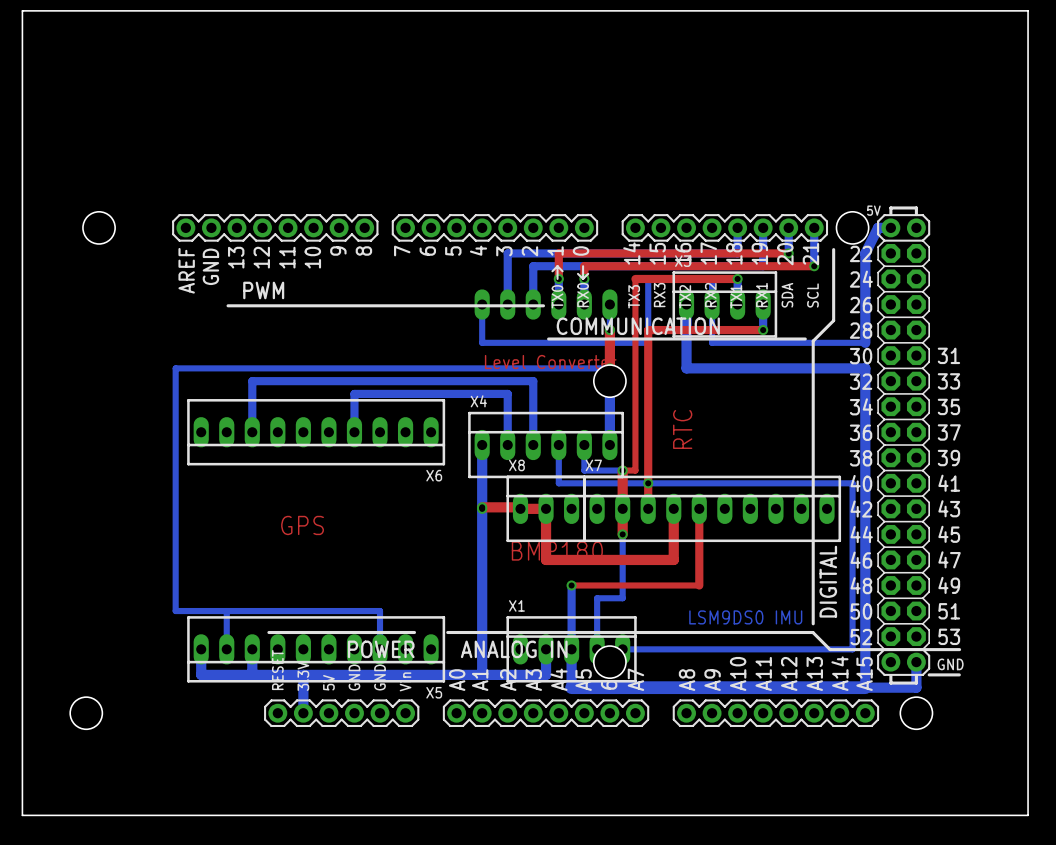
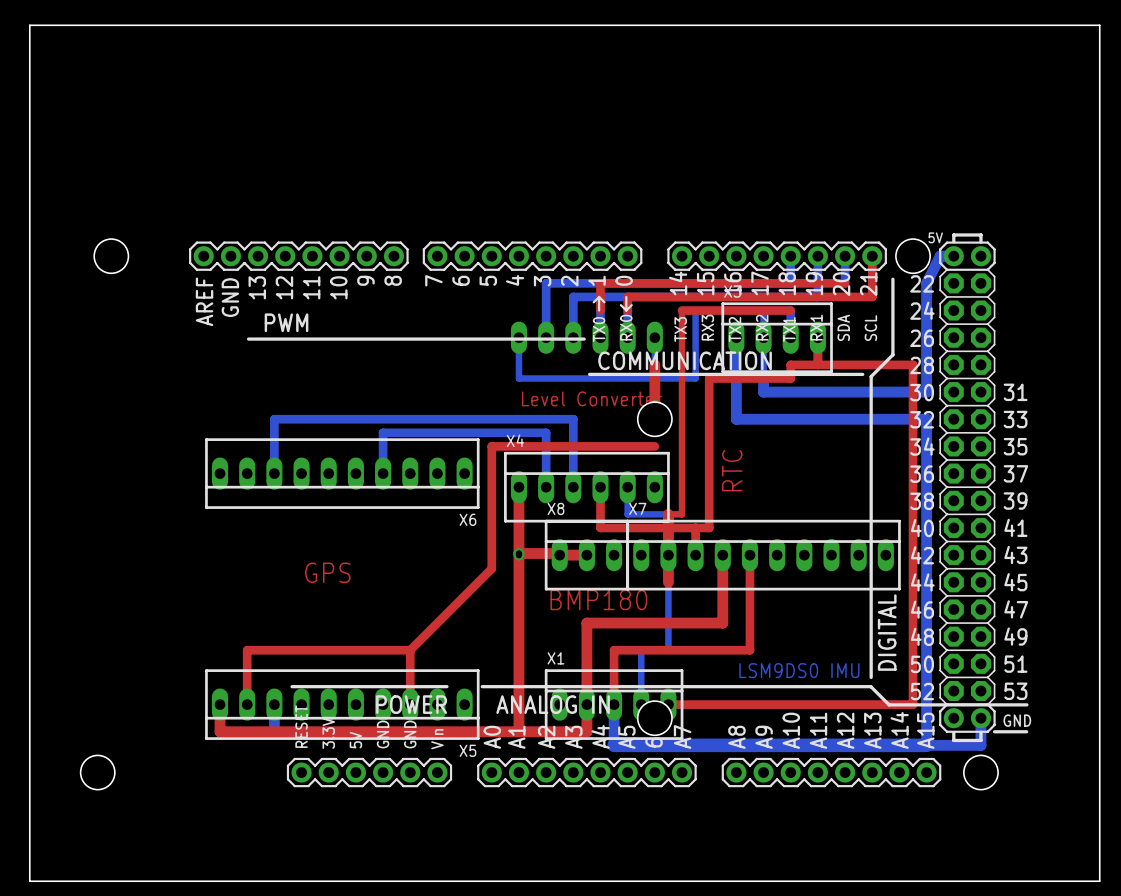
top track: none -> (872, 256) (872, 296)
bottom track: (814, 227) (814, 266) -> none
via: (788, 253) -> none
via: (814, 266) -> none
via: (558, 278) -> none
via: (584, 278) -> none
via: (737, 278) -> none
top track: none -> (817, 337) (817, 364) (913, 364) (913, 704) (668, 704)
via: (609, 330) -> none
top track: (737, 330) (648, 330) (648, 483) -> (790, 364) (790, 378) (709, 378) (709, 527) (600, 527) (600, 487)
via: (763, 330) -> none
bottom track: (712, 342) (865, 342) -> (763, 378) (763, 392) (926, 392) (926, 378)
bottom track: (686, 368) (865, 368) (865, 381) -> (736, 405) (736, 419) (926, 419)
top track: none -> (654, 446) (491, 446) (491, 568) (410, 650)
top track: none -> (518, 487) (518, 731)
bottom track: (482, 445) (482, 507) -> none
bottom track: (558, 445) (558, 483) (852, 483) (852, 649) (622, 649) -> none
bottom track: (609, 445) (609, 368) (175, 368) (175, 611) (380, 611) (380, 649) -> none
via: (622, 470) -> none
via: (648, 483) -> none
bottom track: (482, 508) (482, 674) -> none
top track: (546, 508) (546, 559) (673, 559) -> (220, 704) (220, 731) (586, 731) (586, 623) (722, 623) (722, 609)
via: (622, 534) -> none
top track: (571, 585) (699, 585) -> (614, 704) (614, 650) (749, 650) (749, 636)
bottom track: (571, 585) (571, 649) -> none
via: (571, 585) -> none
top track: none -> (410, 650) (247, 650) (247, 704)
top track: none -> (410, 650) (410, 704)
bottom track: (226, 611) (226, 649) -> none
bottom track: (201, 649) (201, 674) (546, 674) (546, 649) -> none
bottom track: (303, 674) (303, 713) -> none

